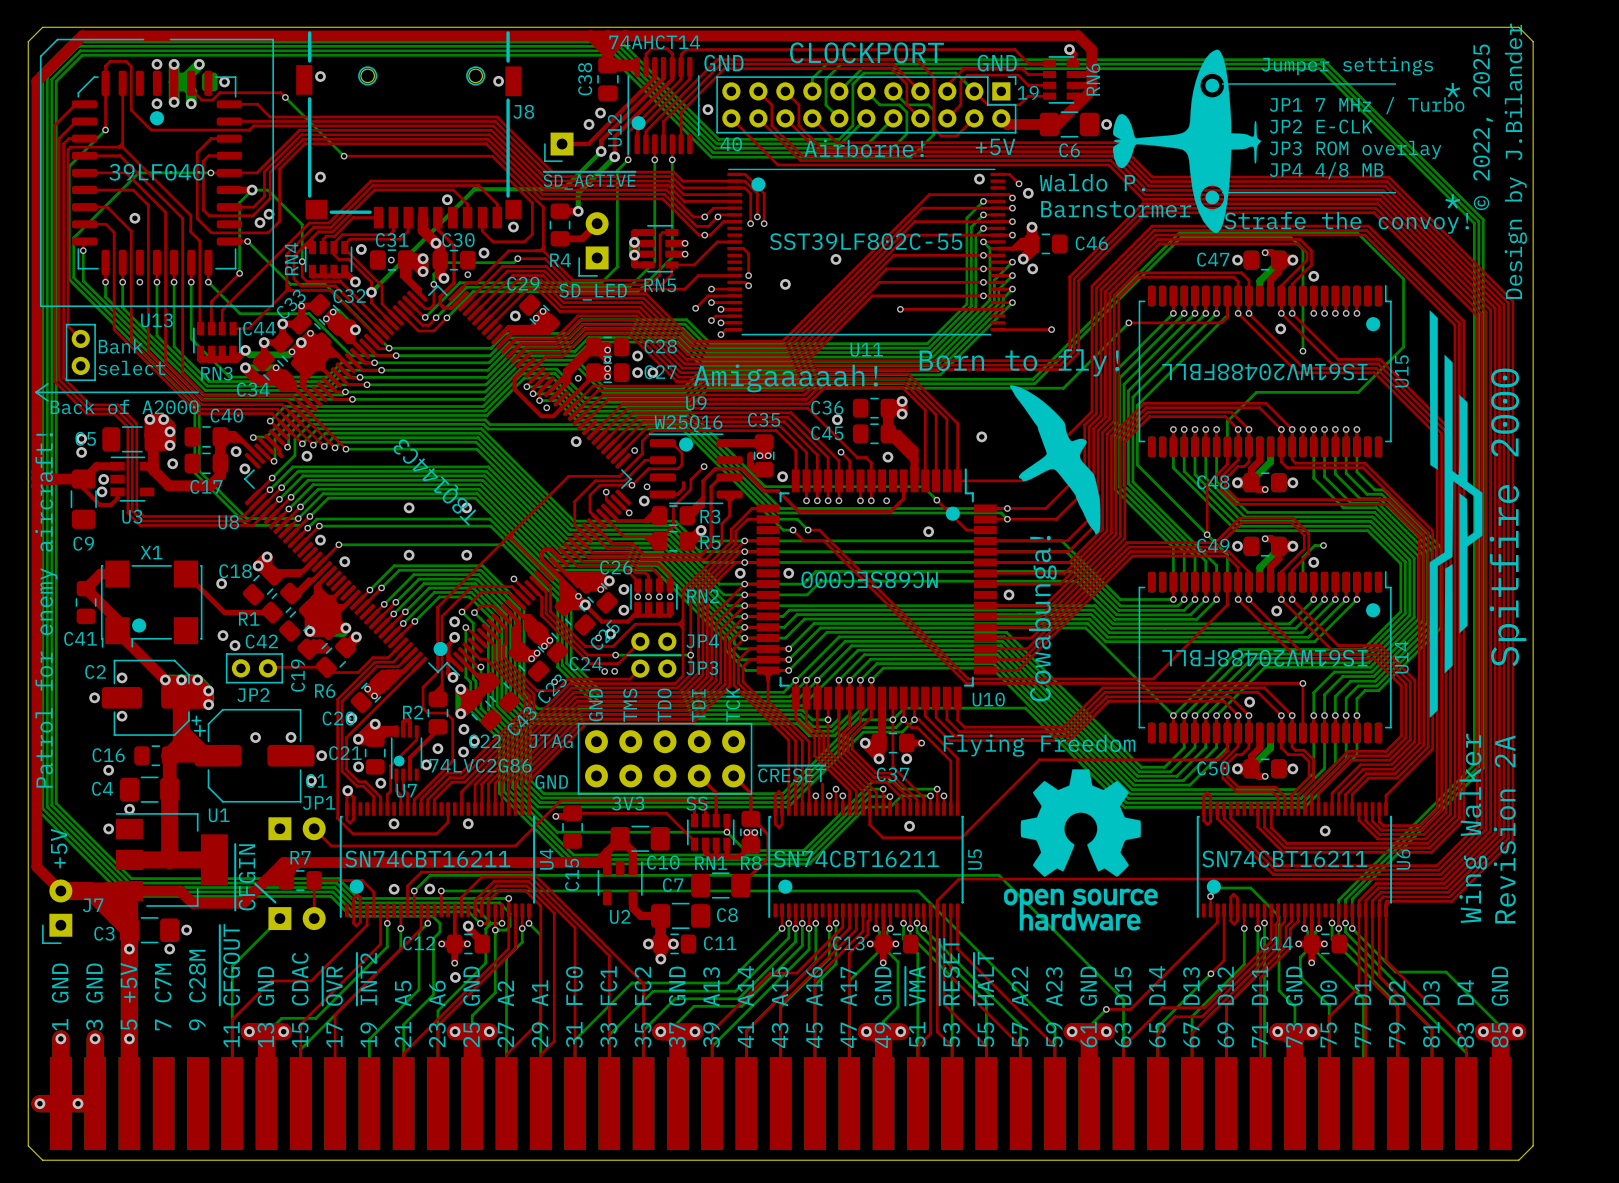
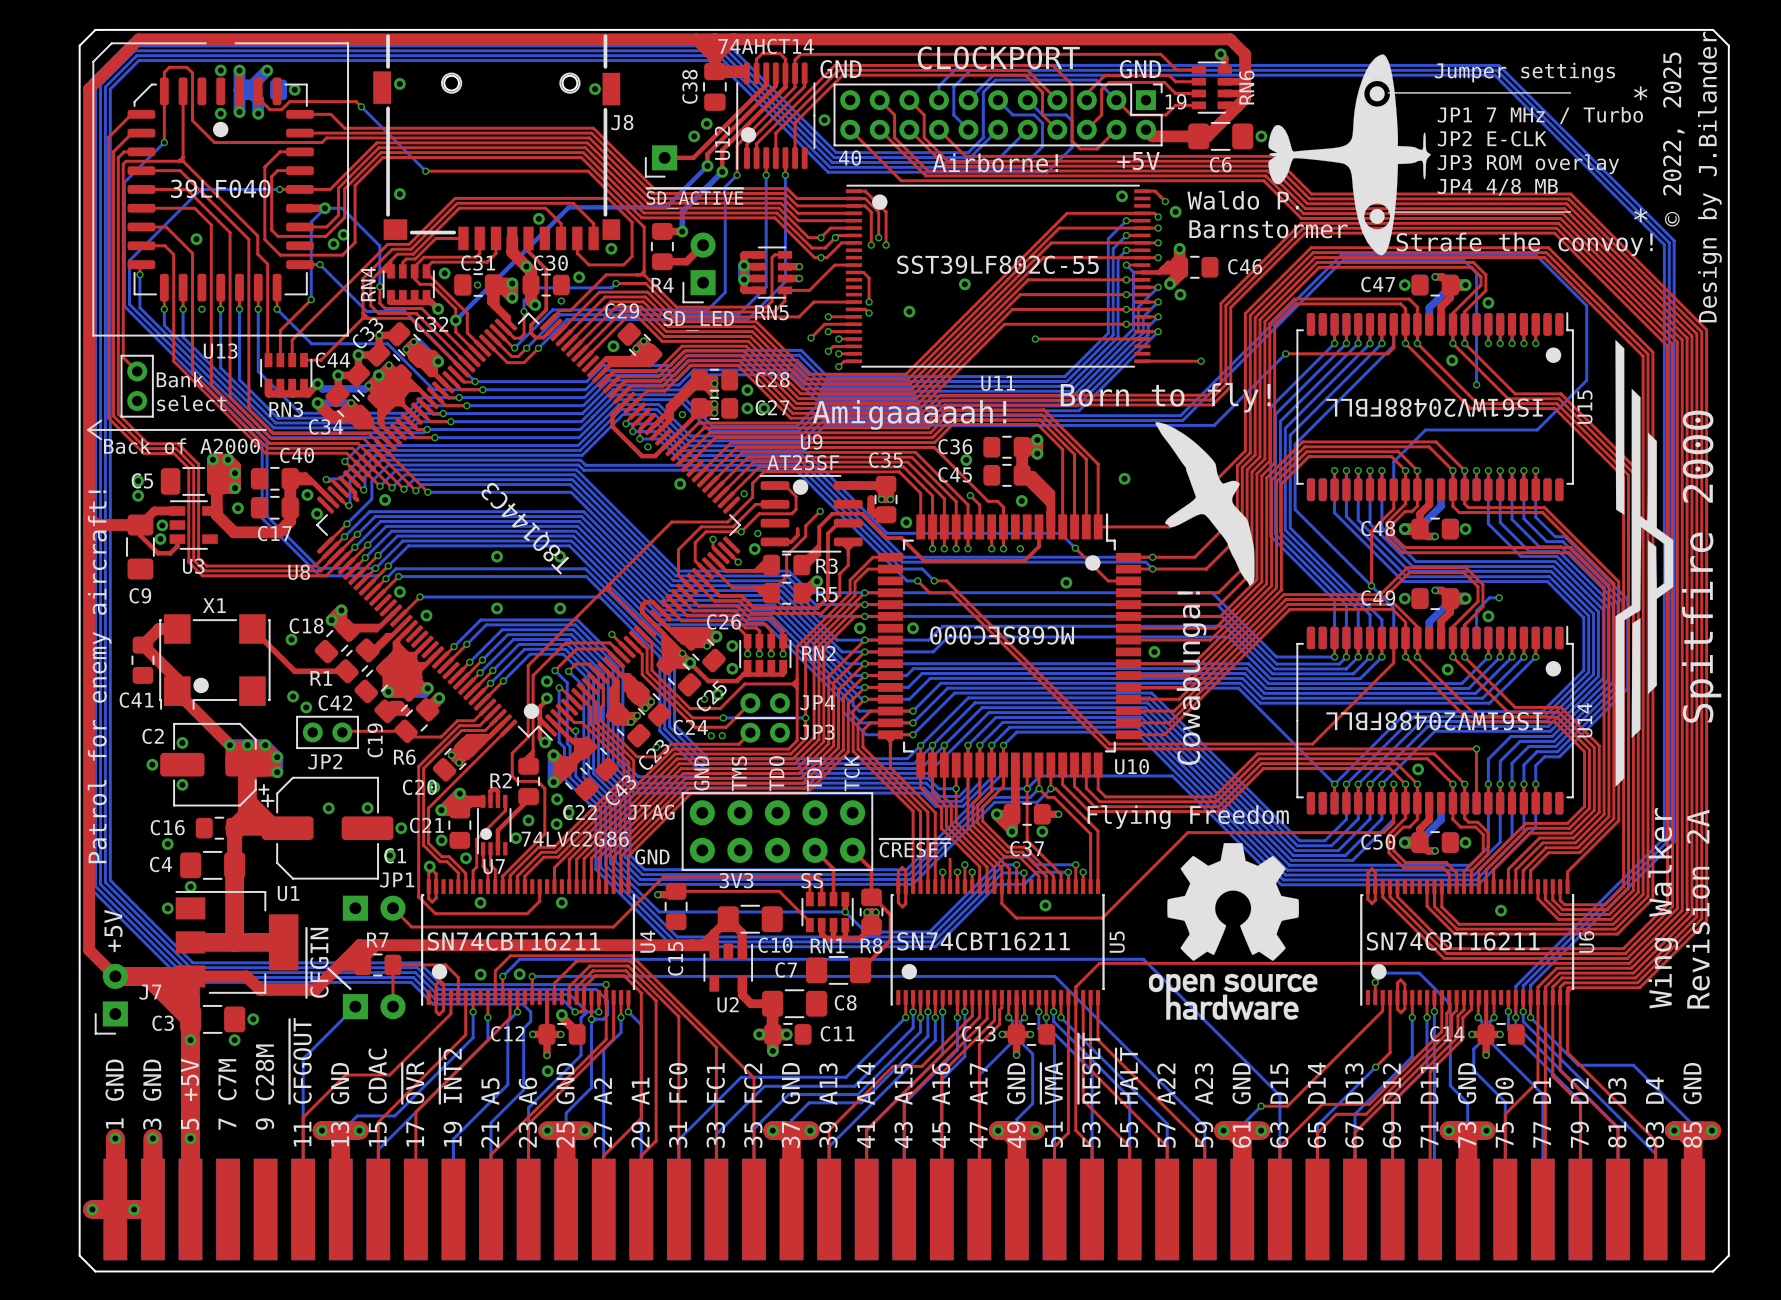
text: W25Q16 (688, 423) -> AT25SF (803, 462)

